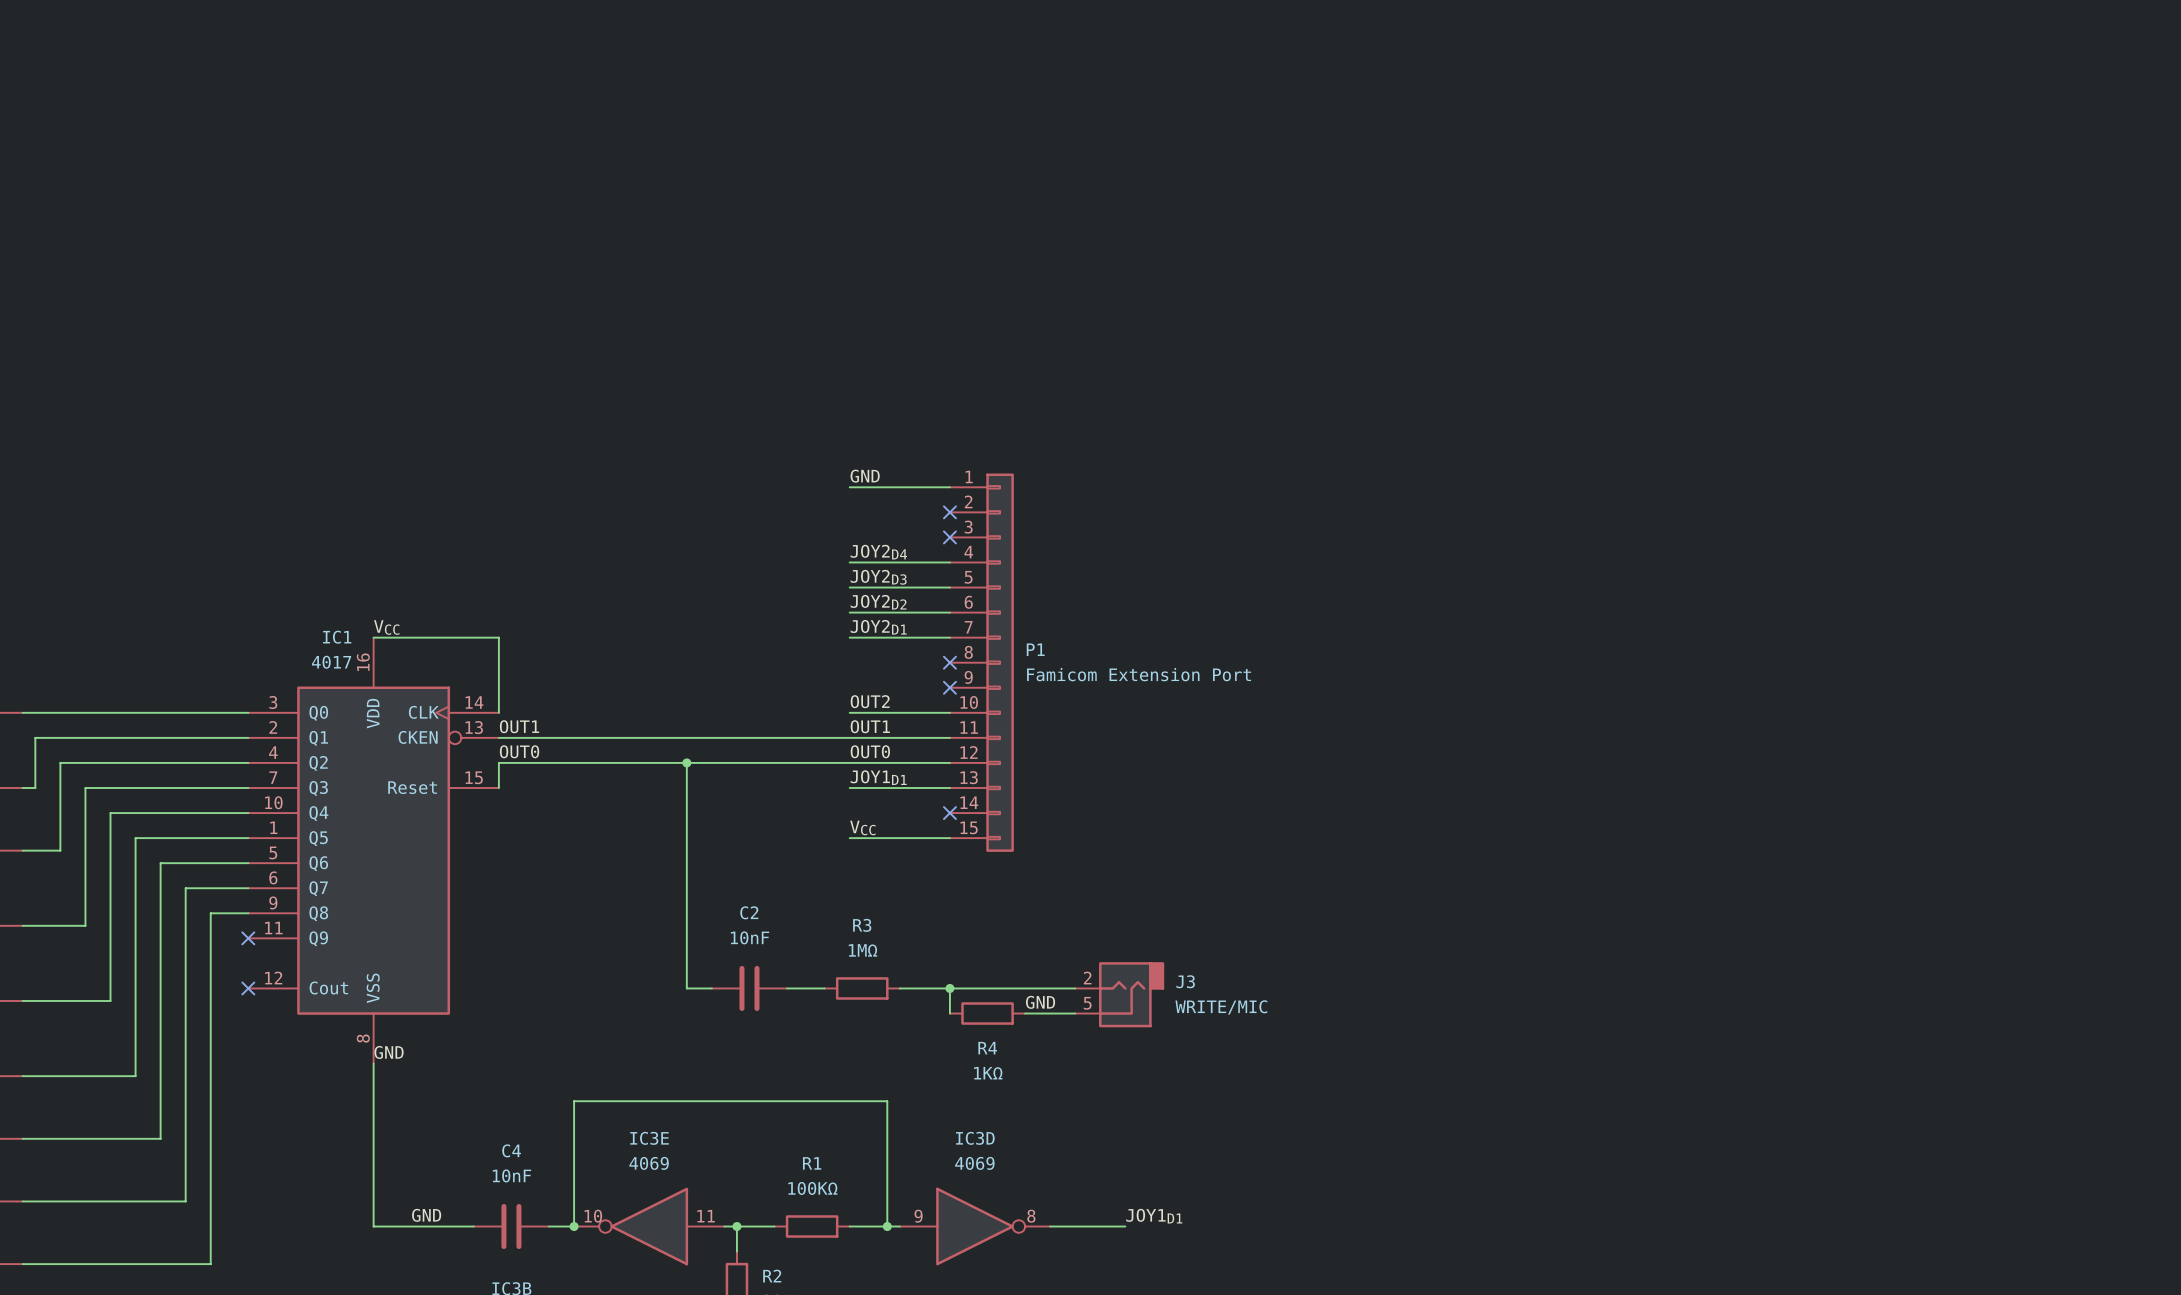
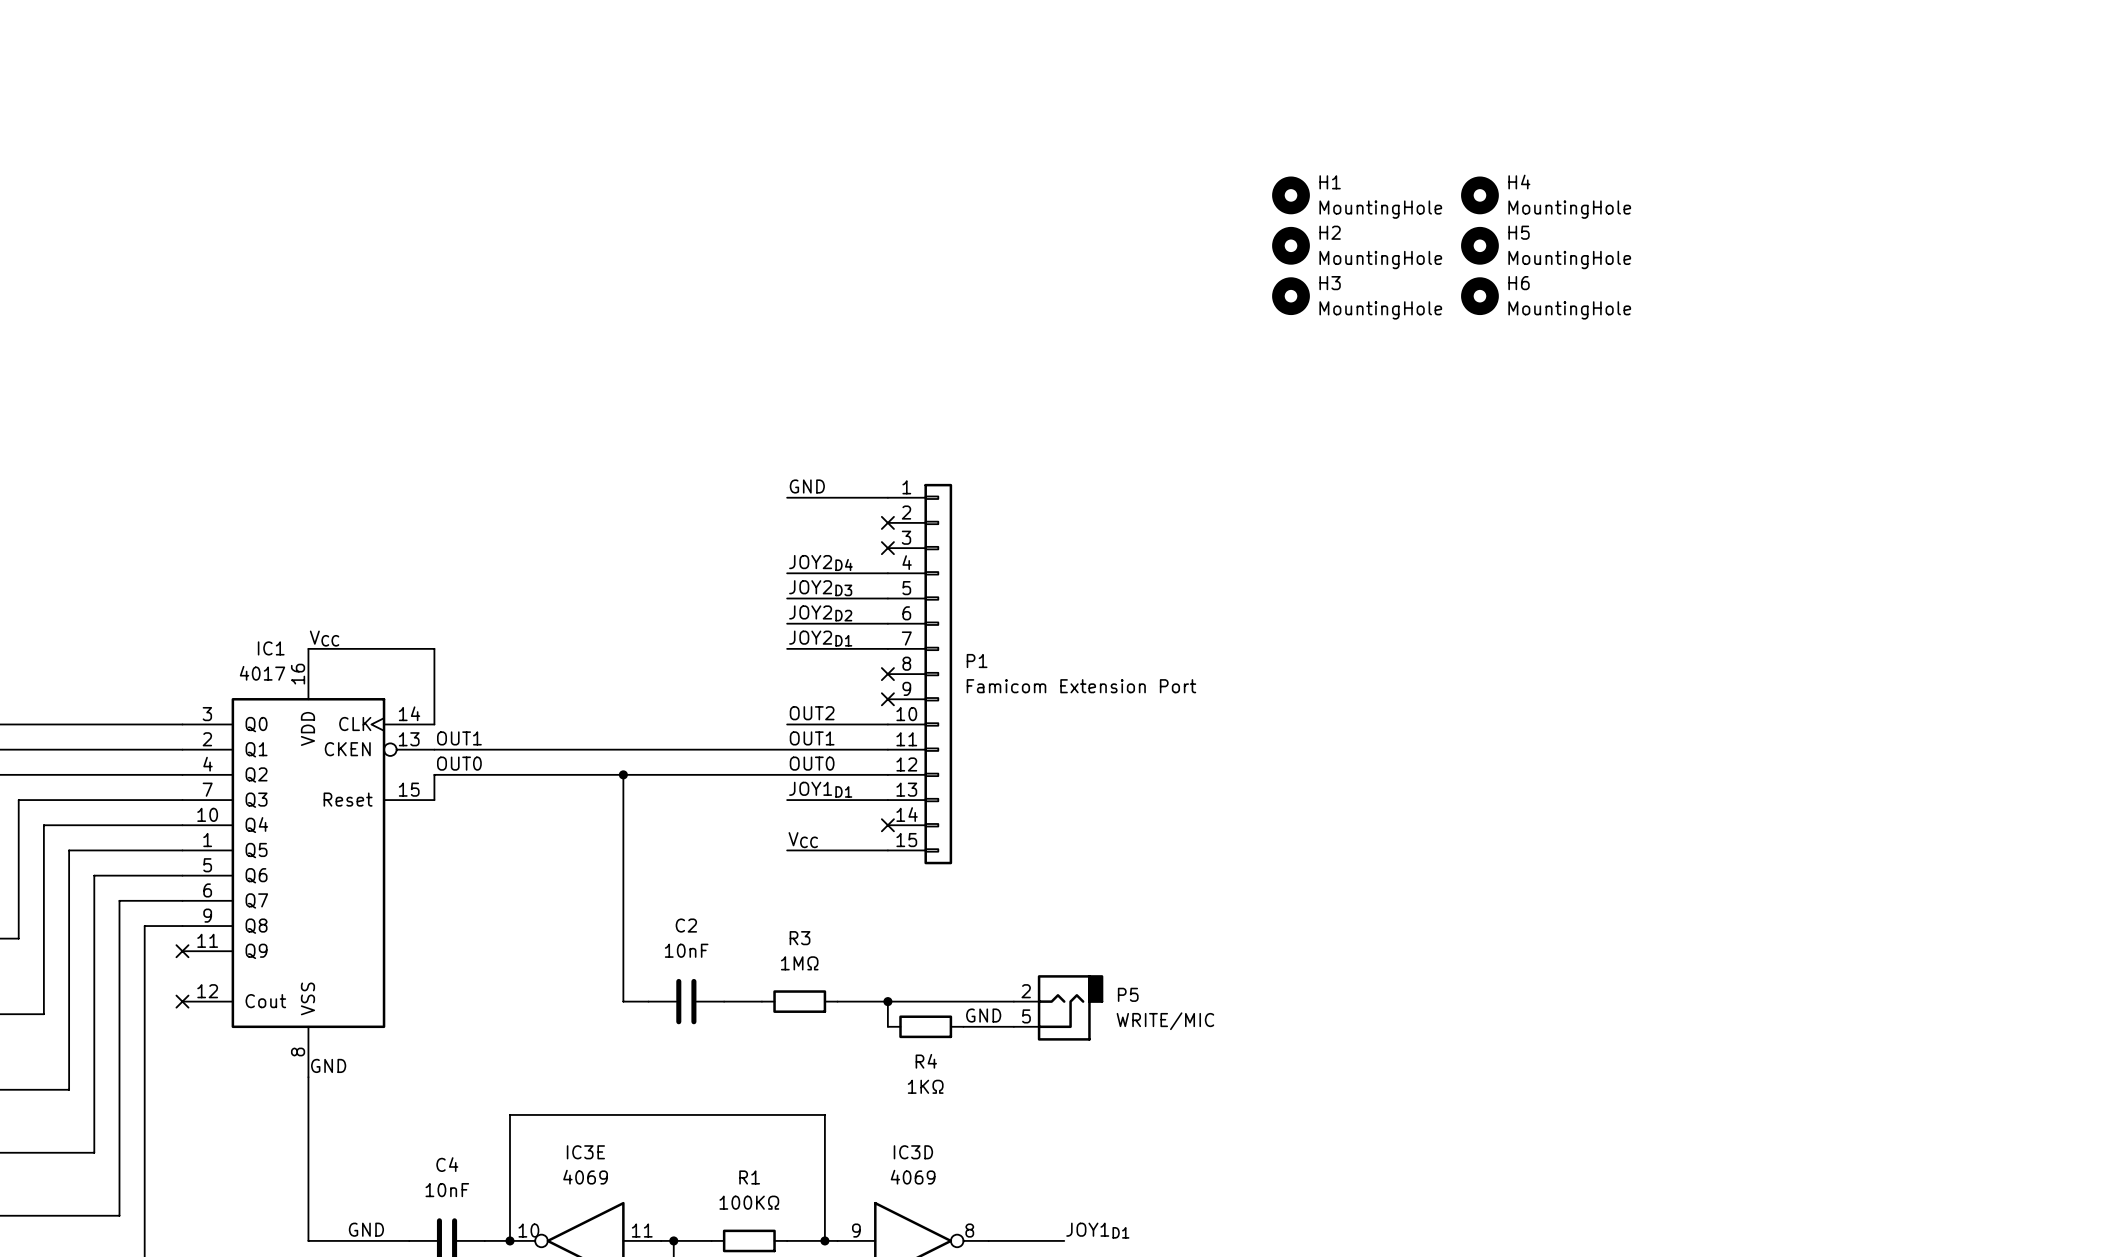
H1: none -> MountingHole (1291, 195)
H4: none -> MountingHole (1479, 195)
H2: none -> MountingHole (1291, 245)
H5: none -> MountingHole (1479, 245)
H3: none -> MountingHole (1291, 296)
H6: none -> MountingHole (1479, 296)
J3 name: J3 (1185, 981) -> P5 (1128, 994)

